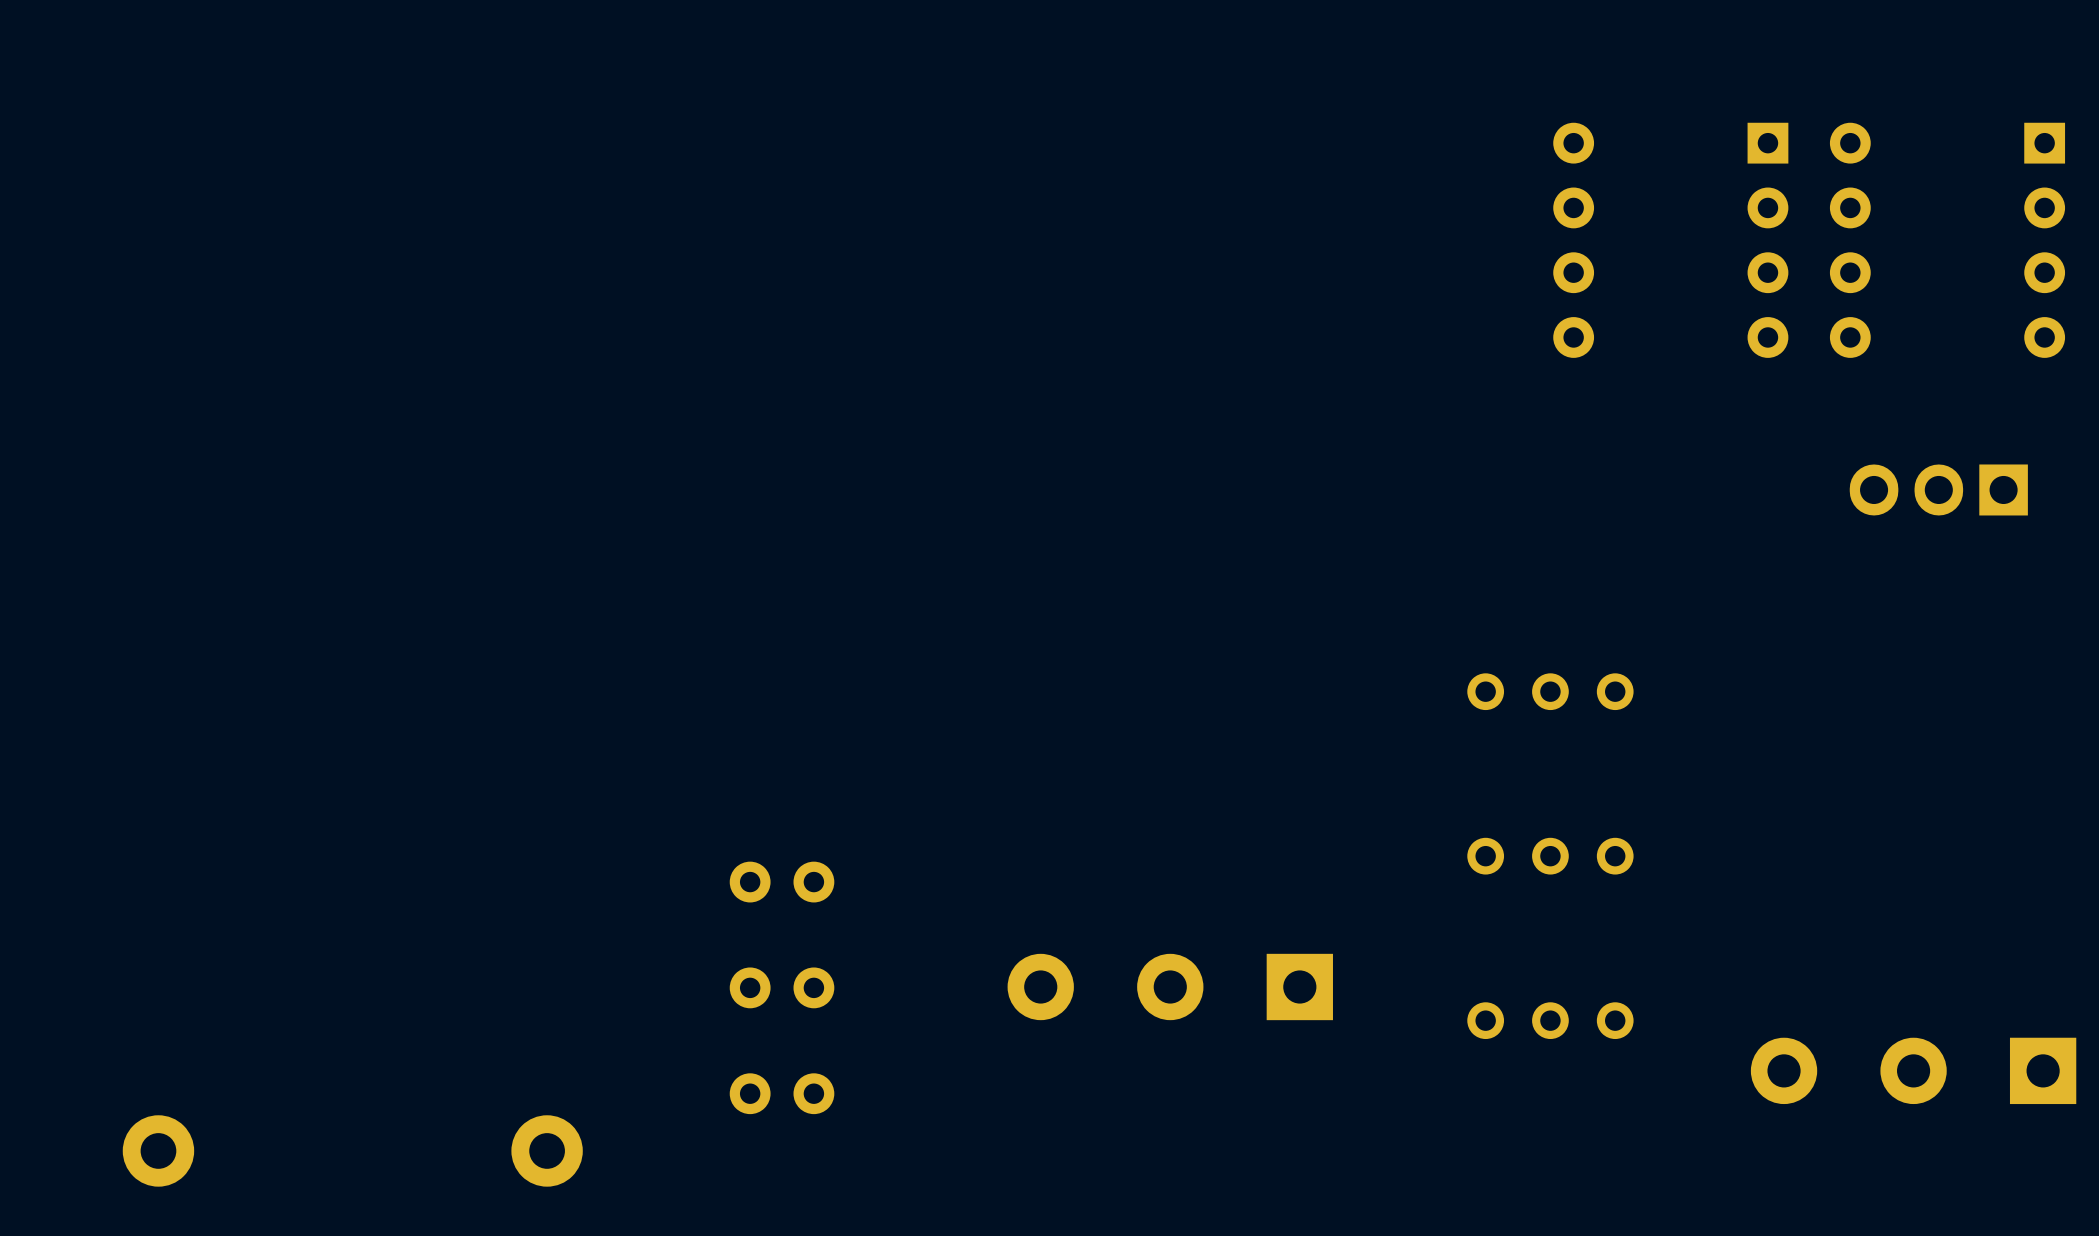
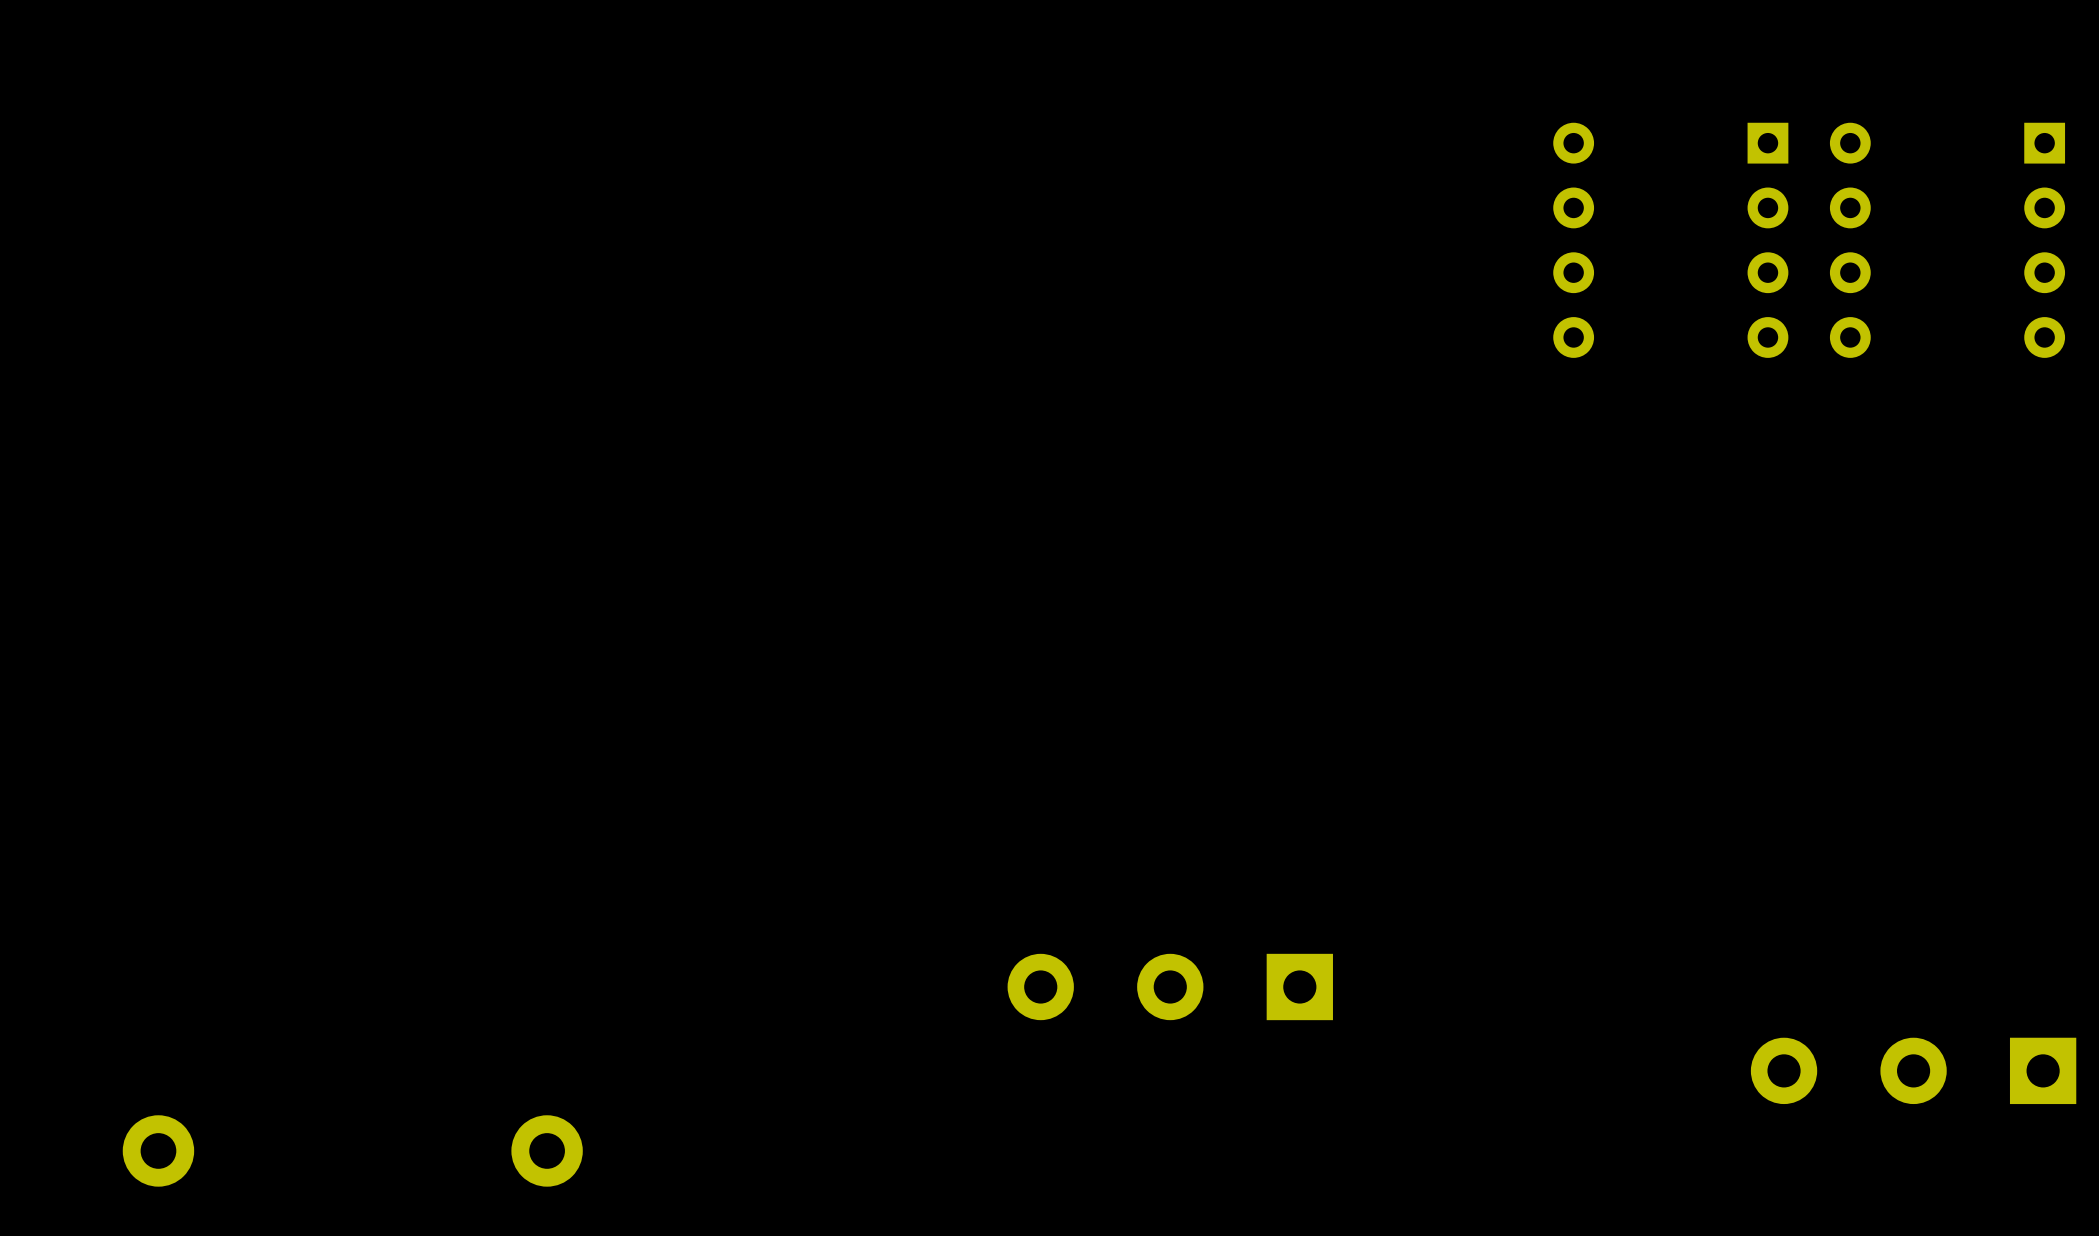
part: (1938, 489) -> none
part: (1550, 691) -> none
part: (1550, 856) -> none
part: (782, 882) -> none
part: (782, 987) -> none
part: (1550, 1020) -> none
part: (782, 1093) -> none

